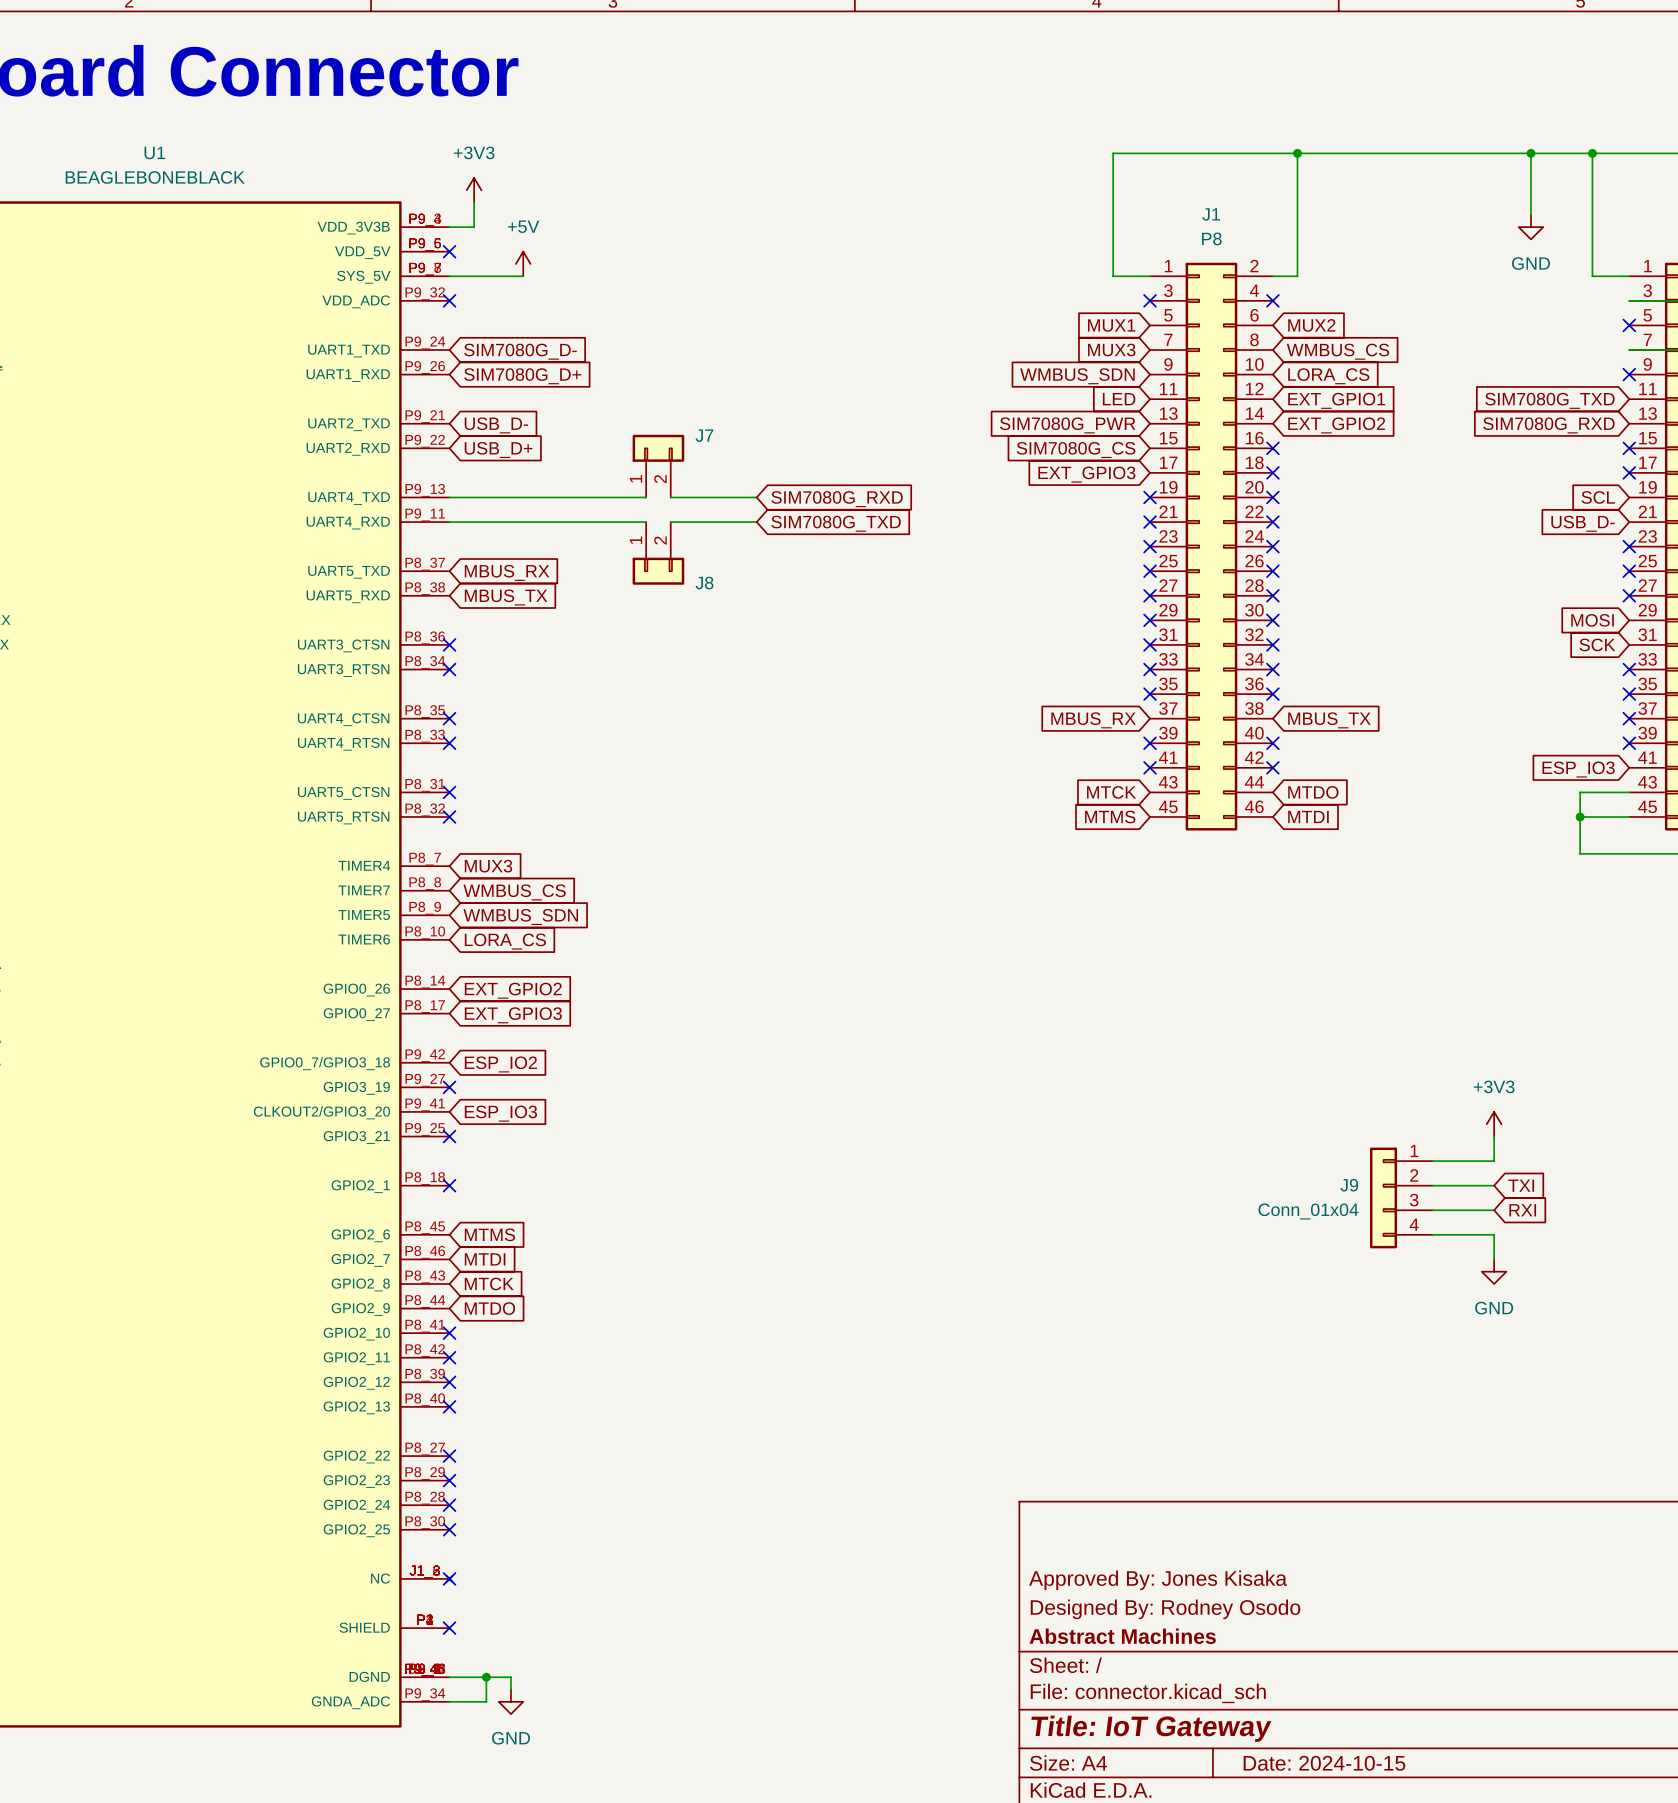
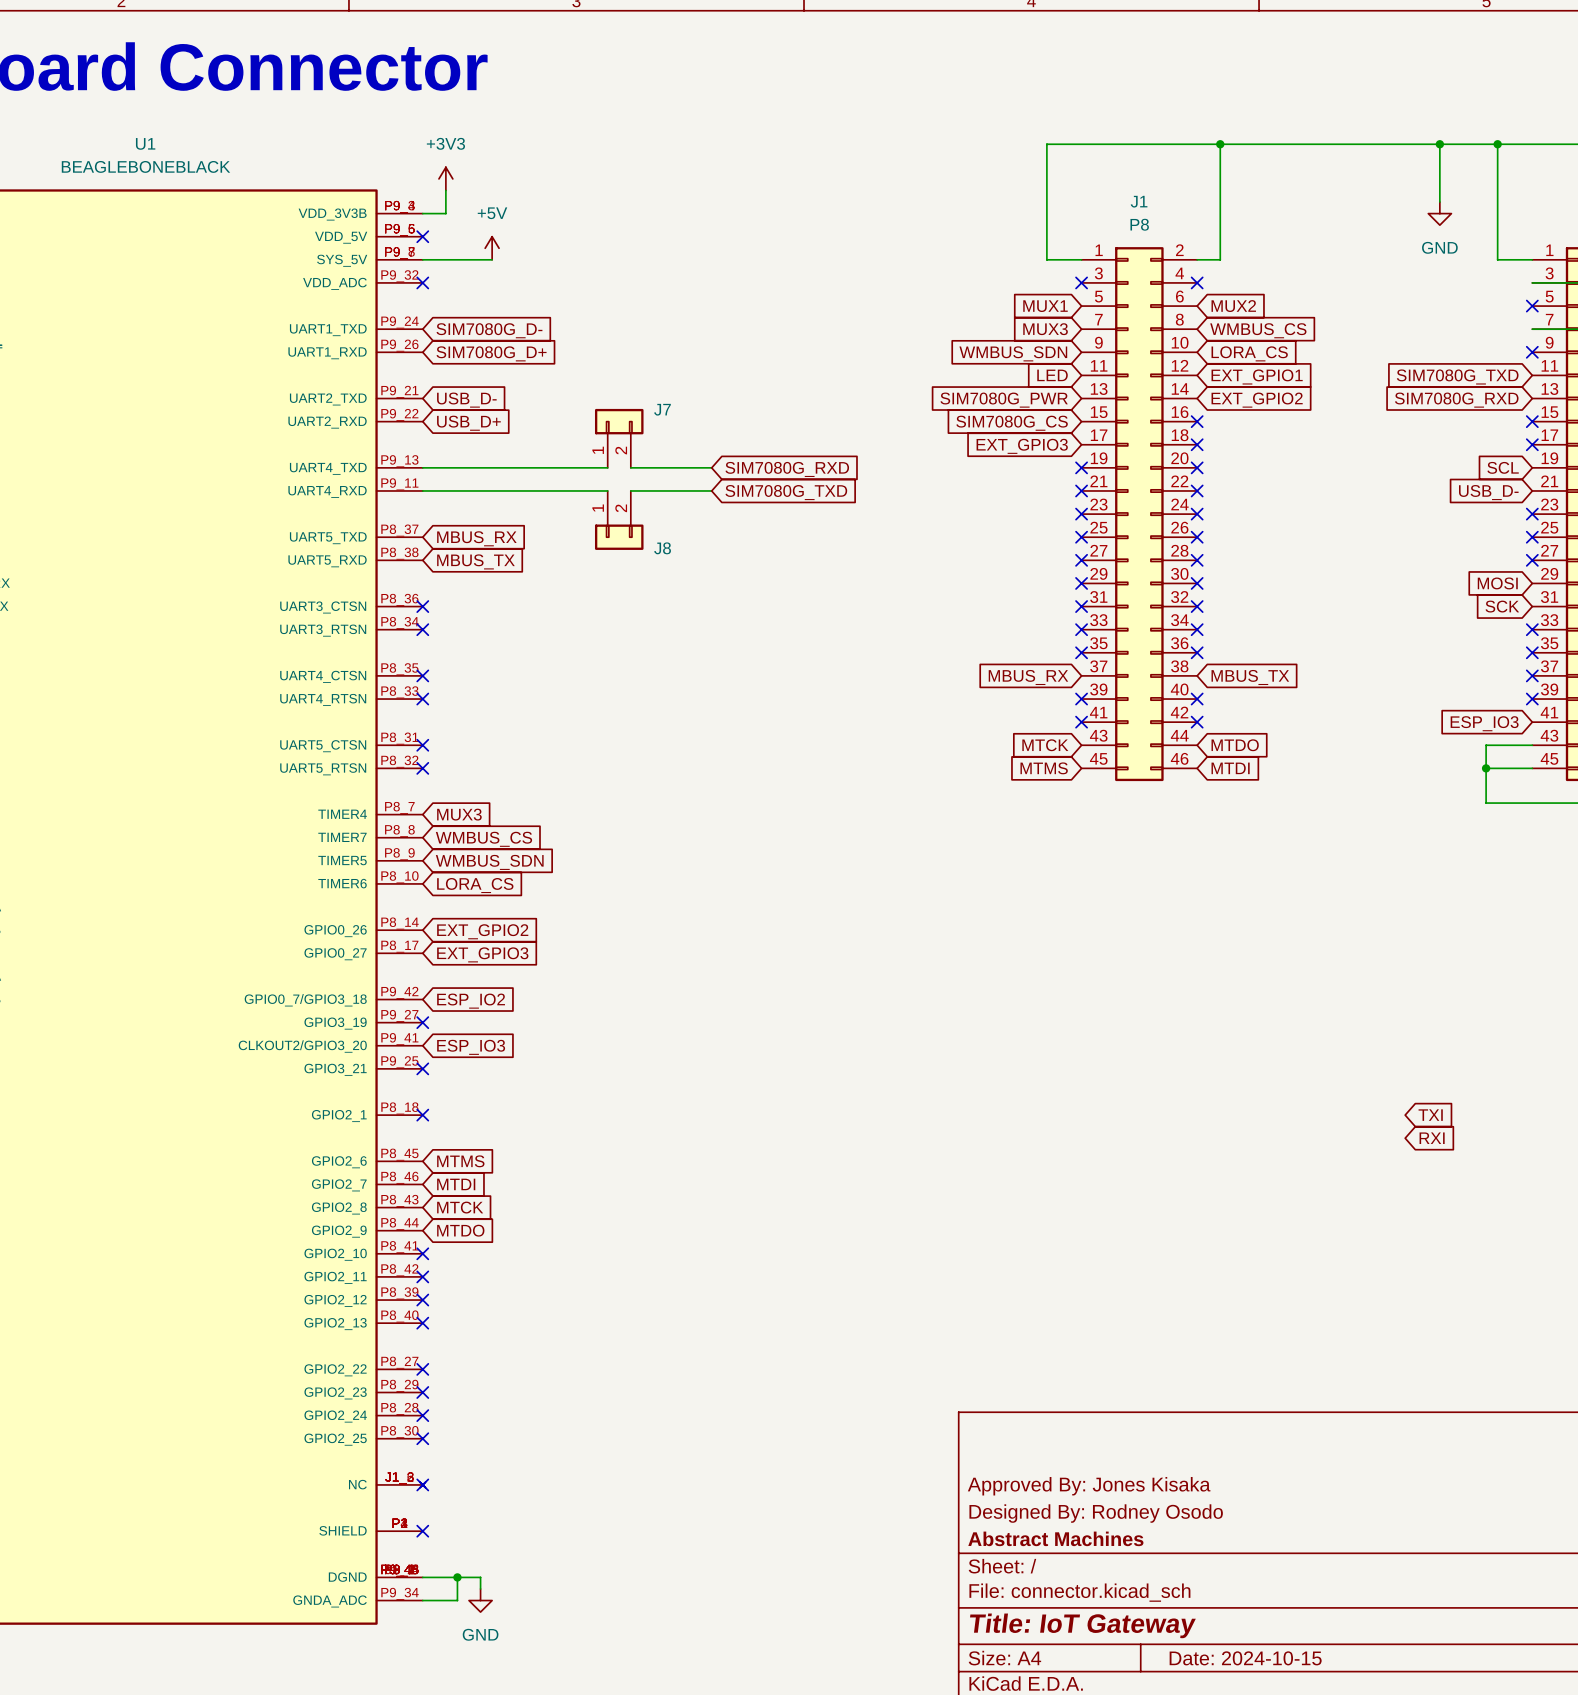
power symbol: +3V3 (1494, 1124) -> none
wire: (1494, 1136) (1494, 1161) (1432, 1161) -> none
wire: (1432, 1185) (1494, 1185) -> none
J9: Conn_01x04 (1401, 1197) -> none
wire: (1432, 1210) (1494, 1210) -> none
wire: (1432, 1234) (1494, 1234) (1494, 1259) -> none
power symbol: GND (1494, 1271) -> none

